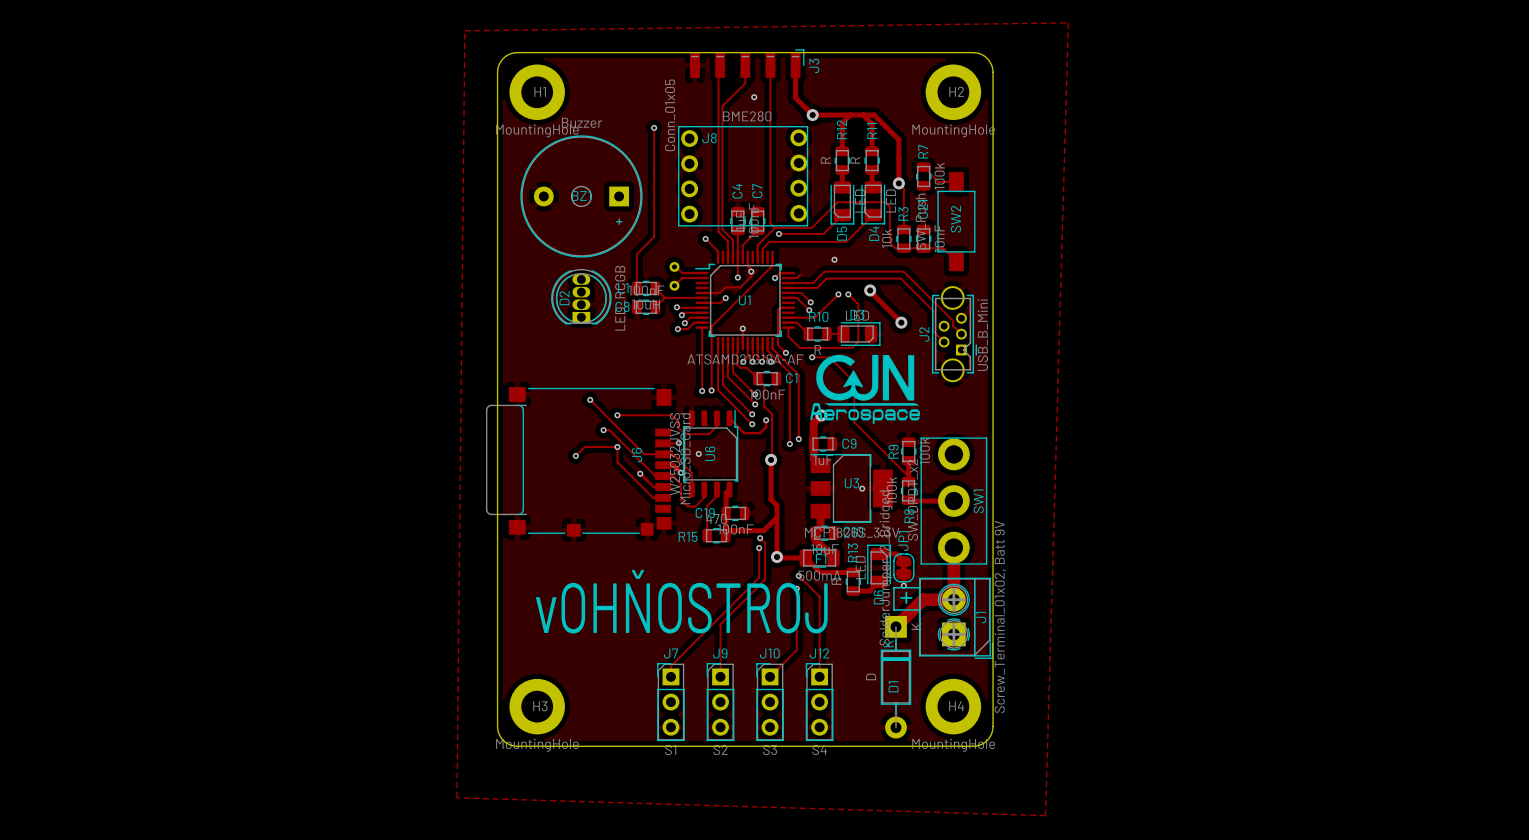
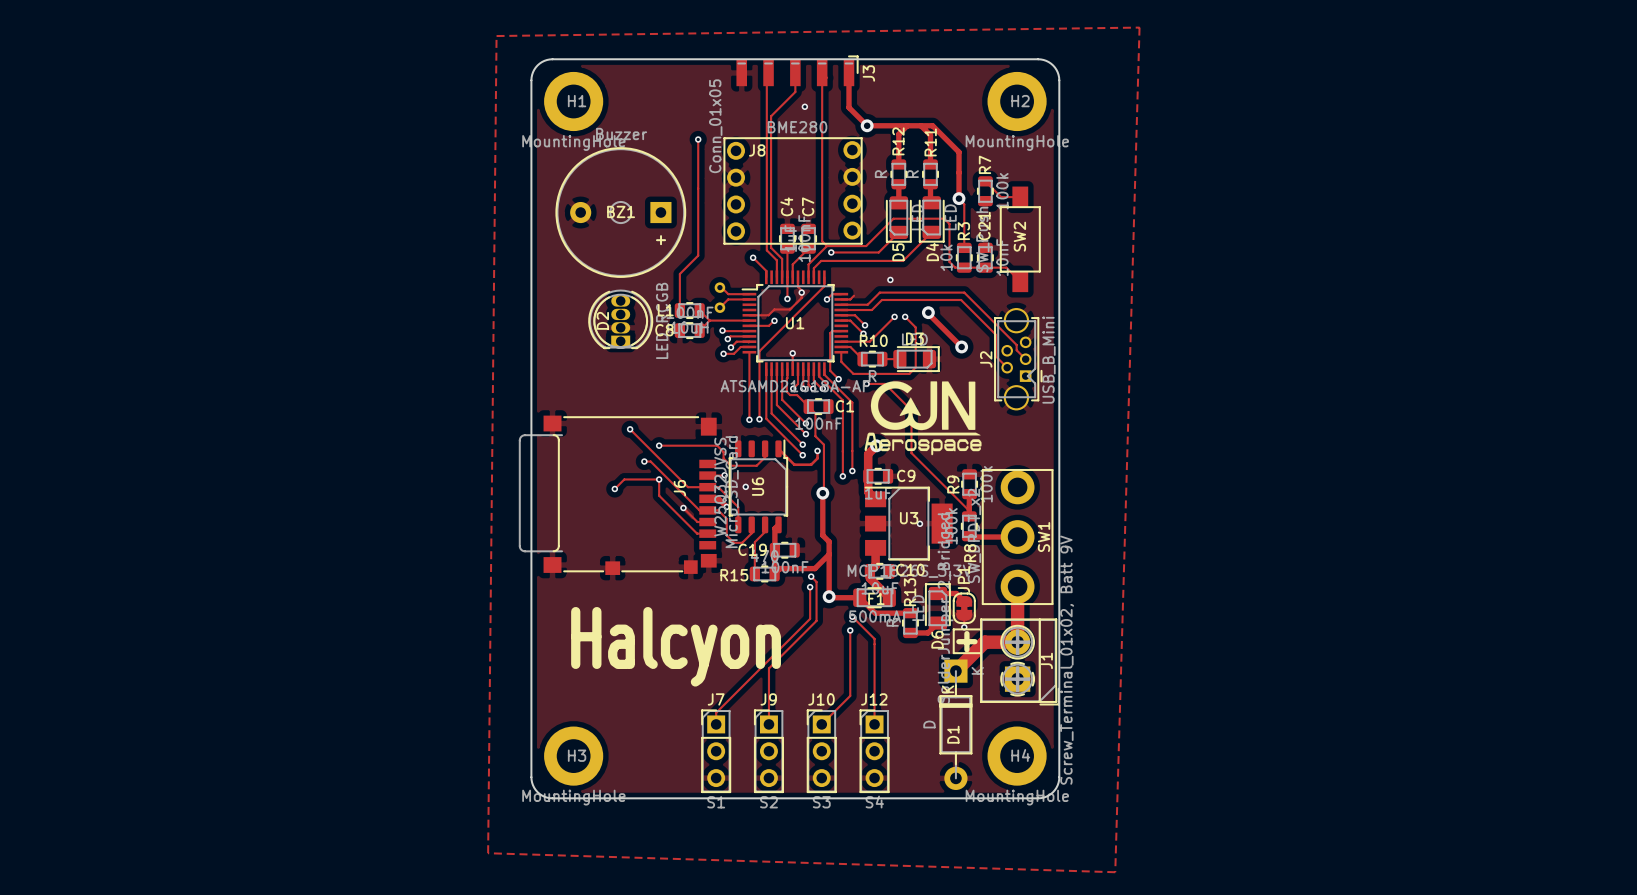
text: vOHŇOSTROJ (681, 601) -> none
text: none -> Halcyon (676, 646)

